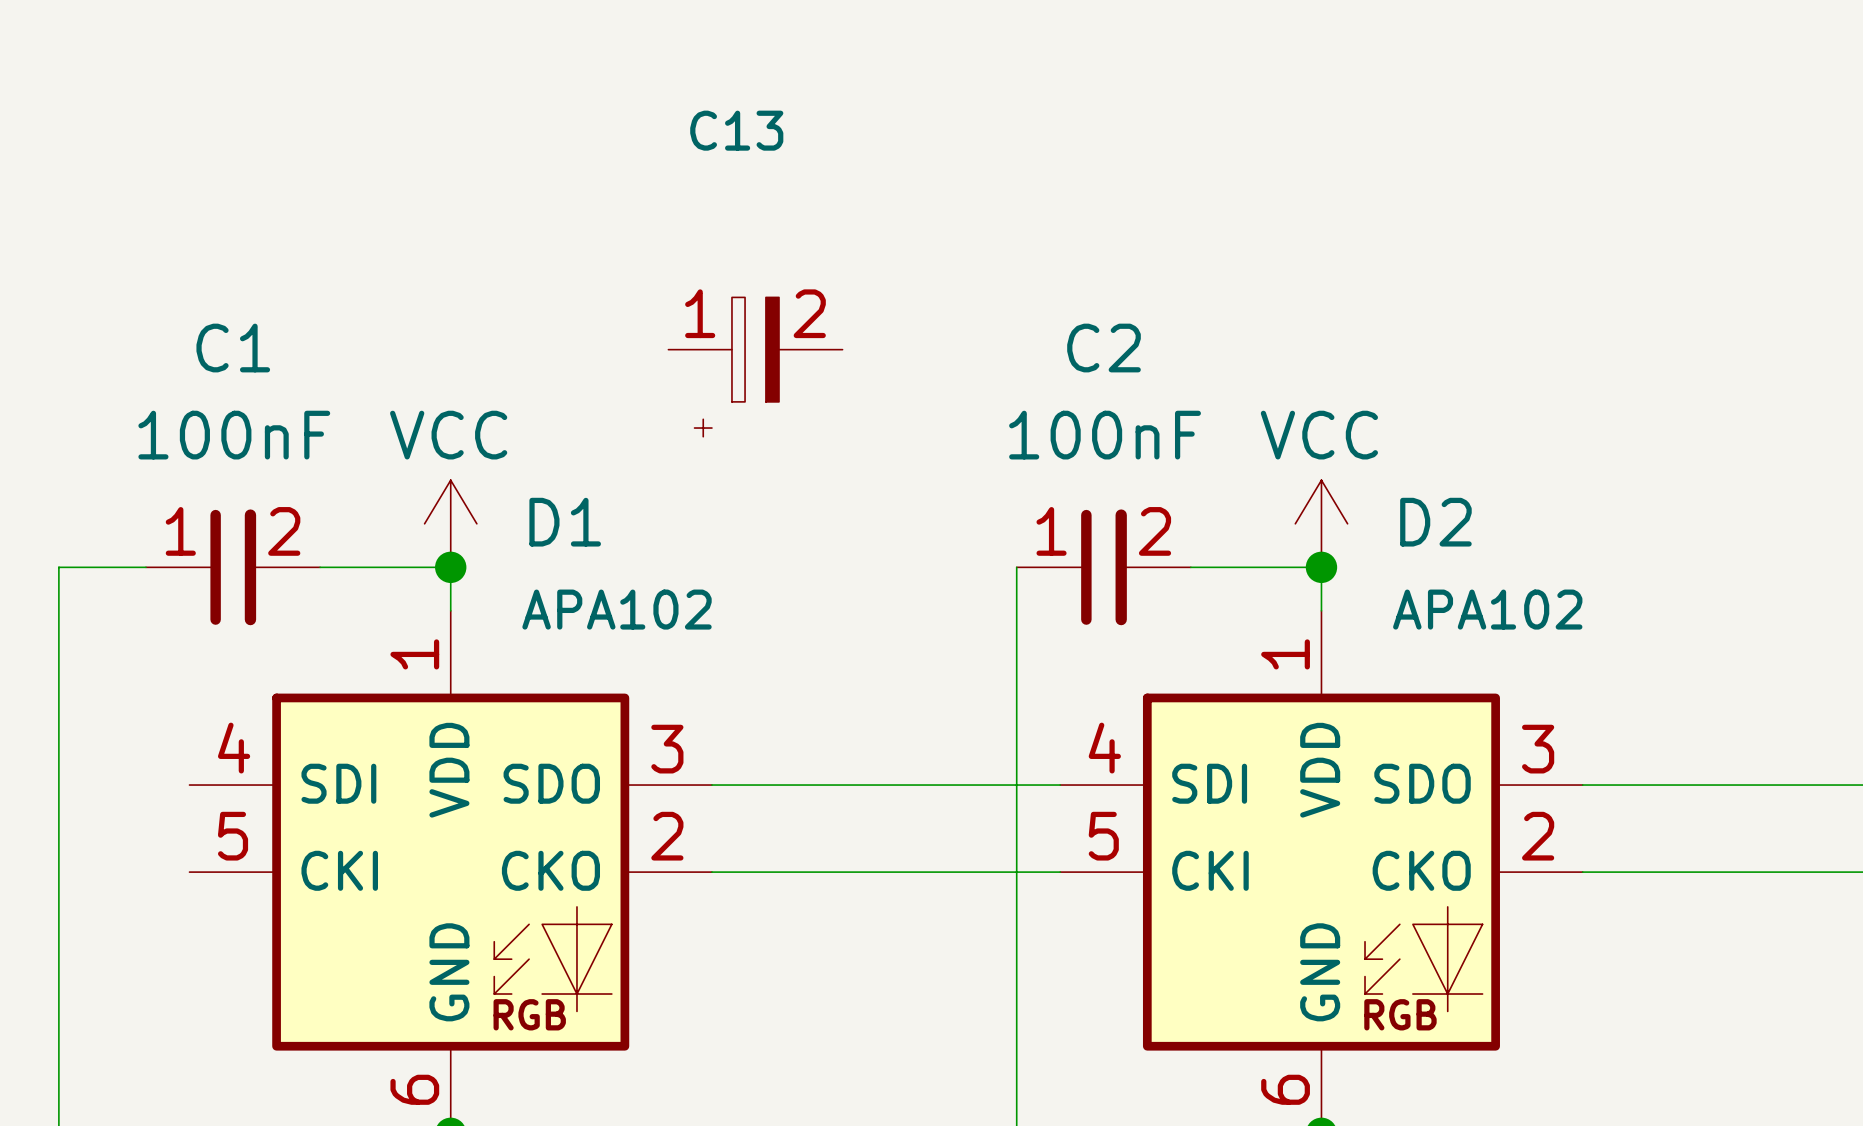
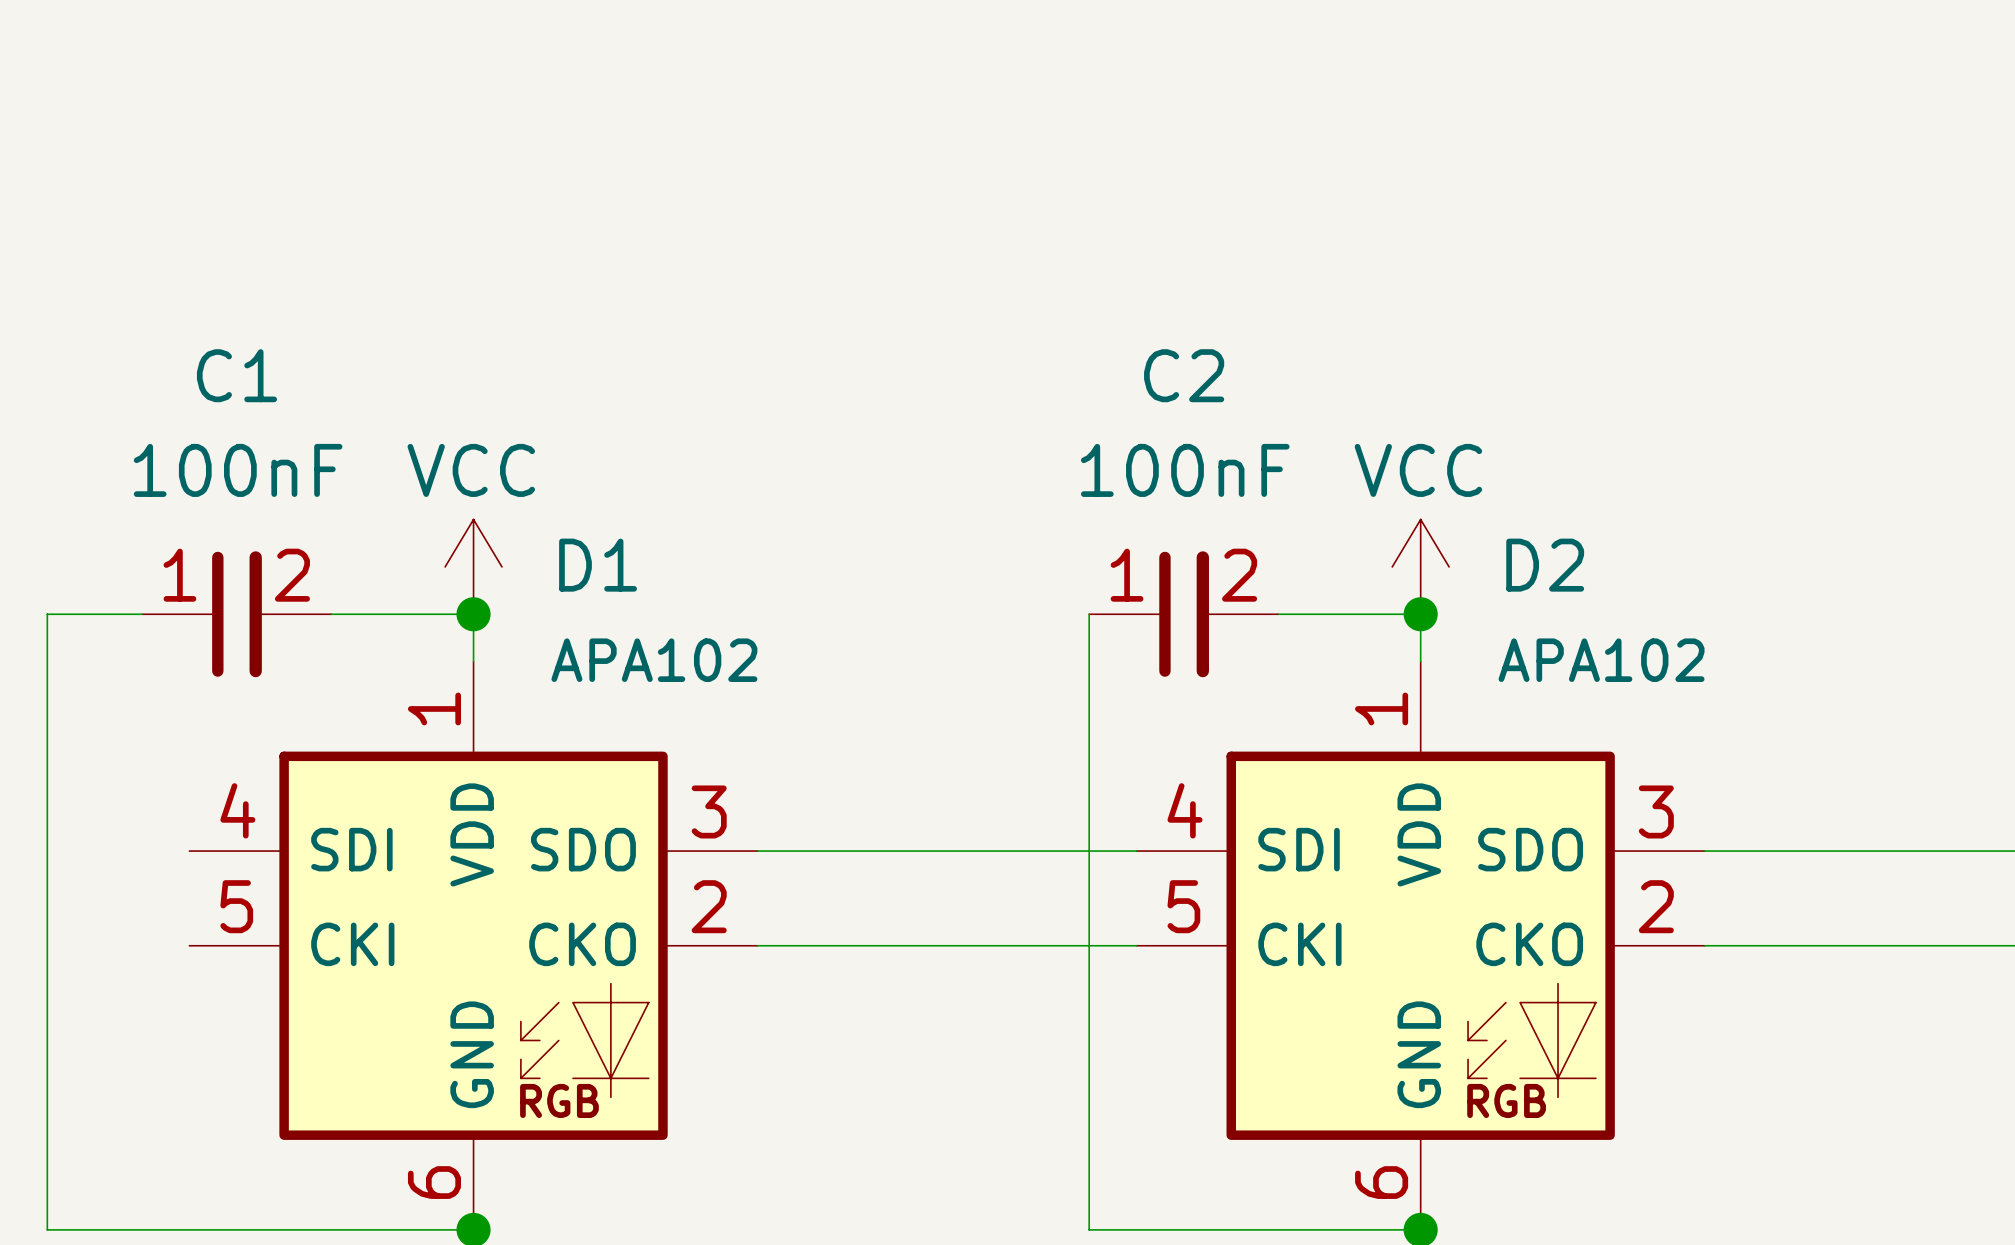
C13: (755, 367) -> none

